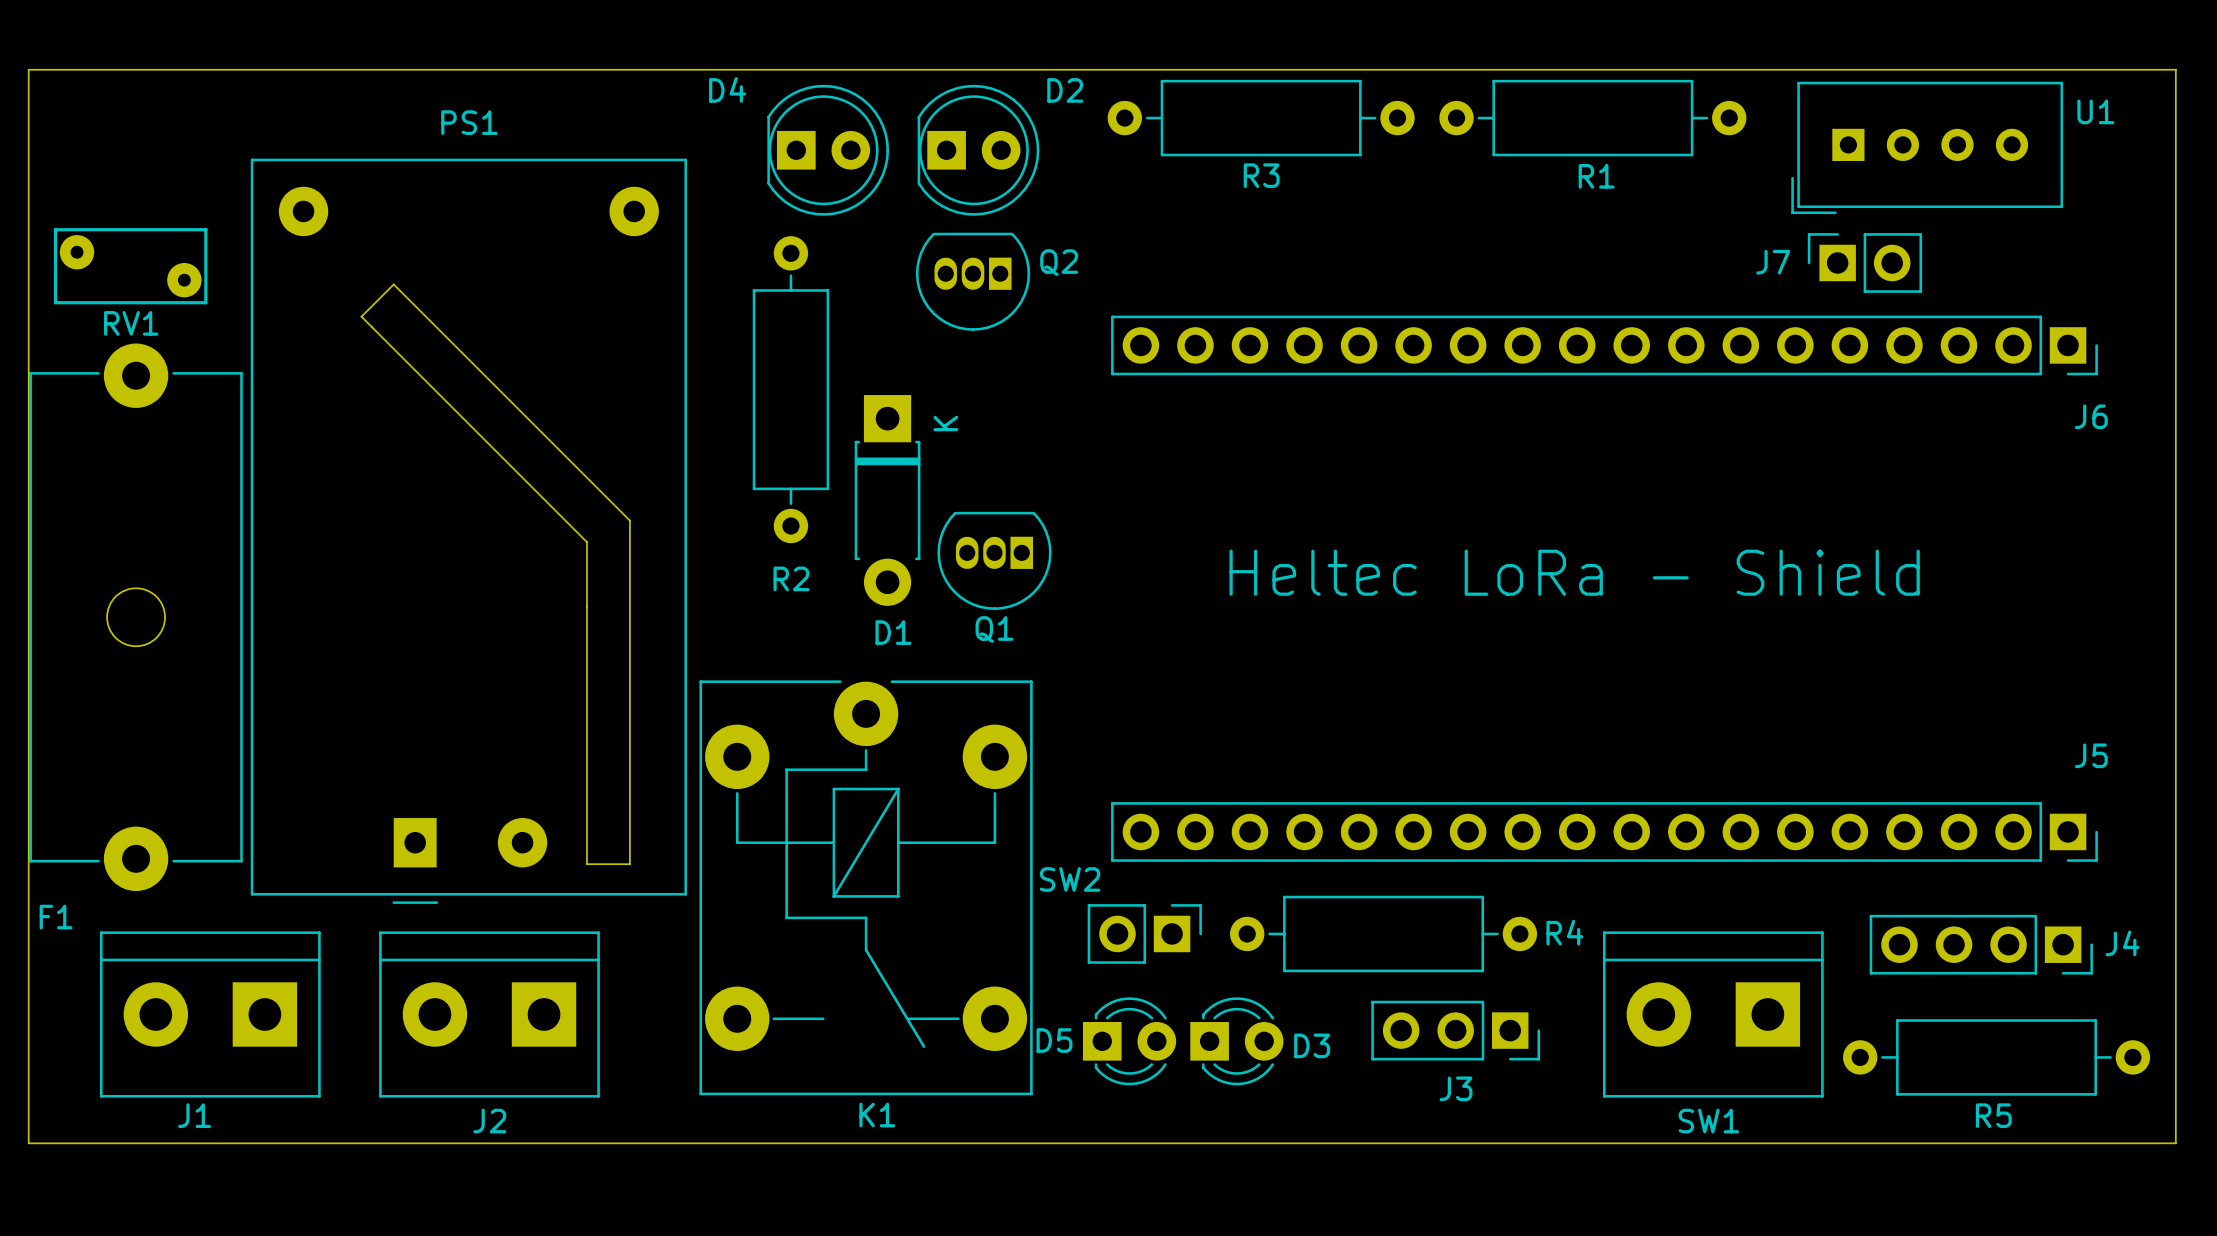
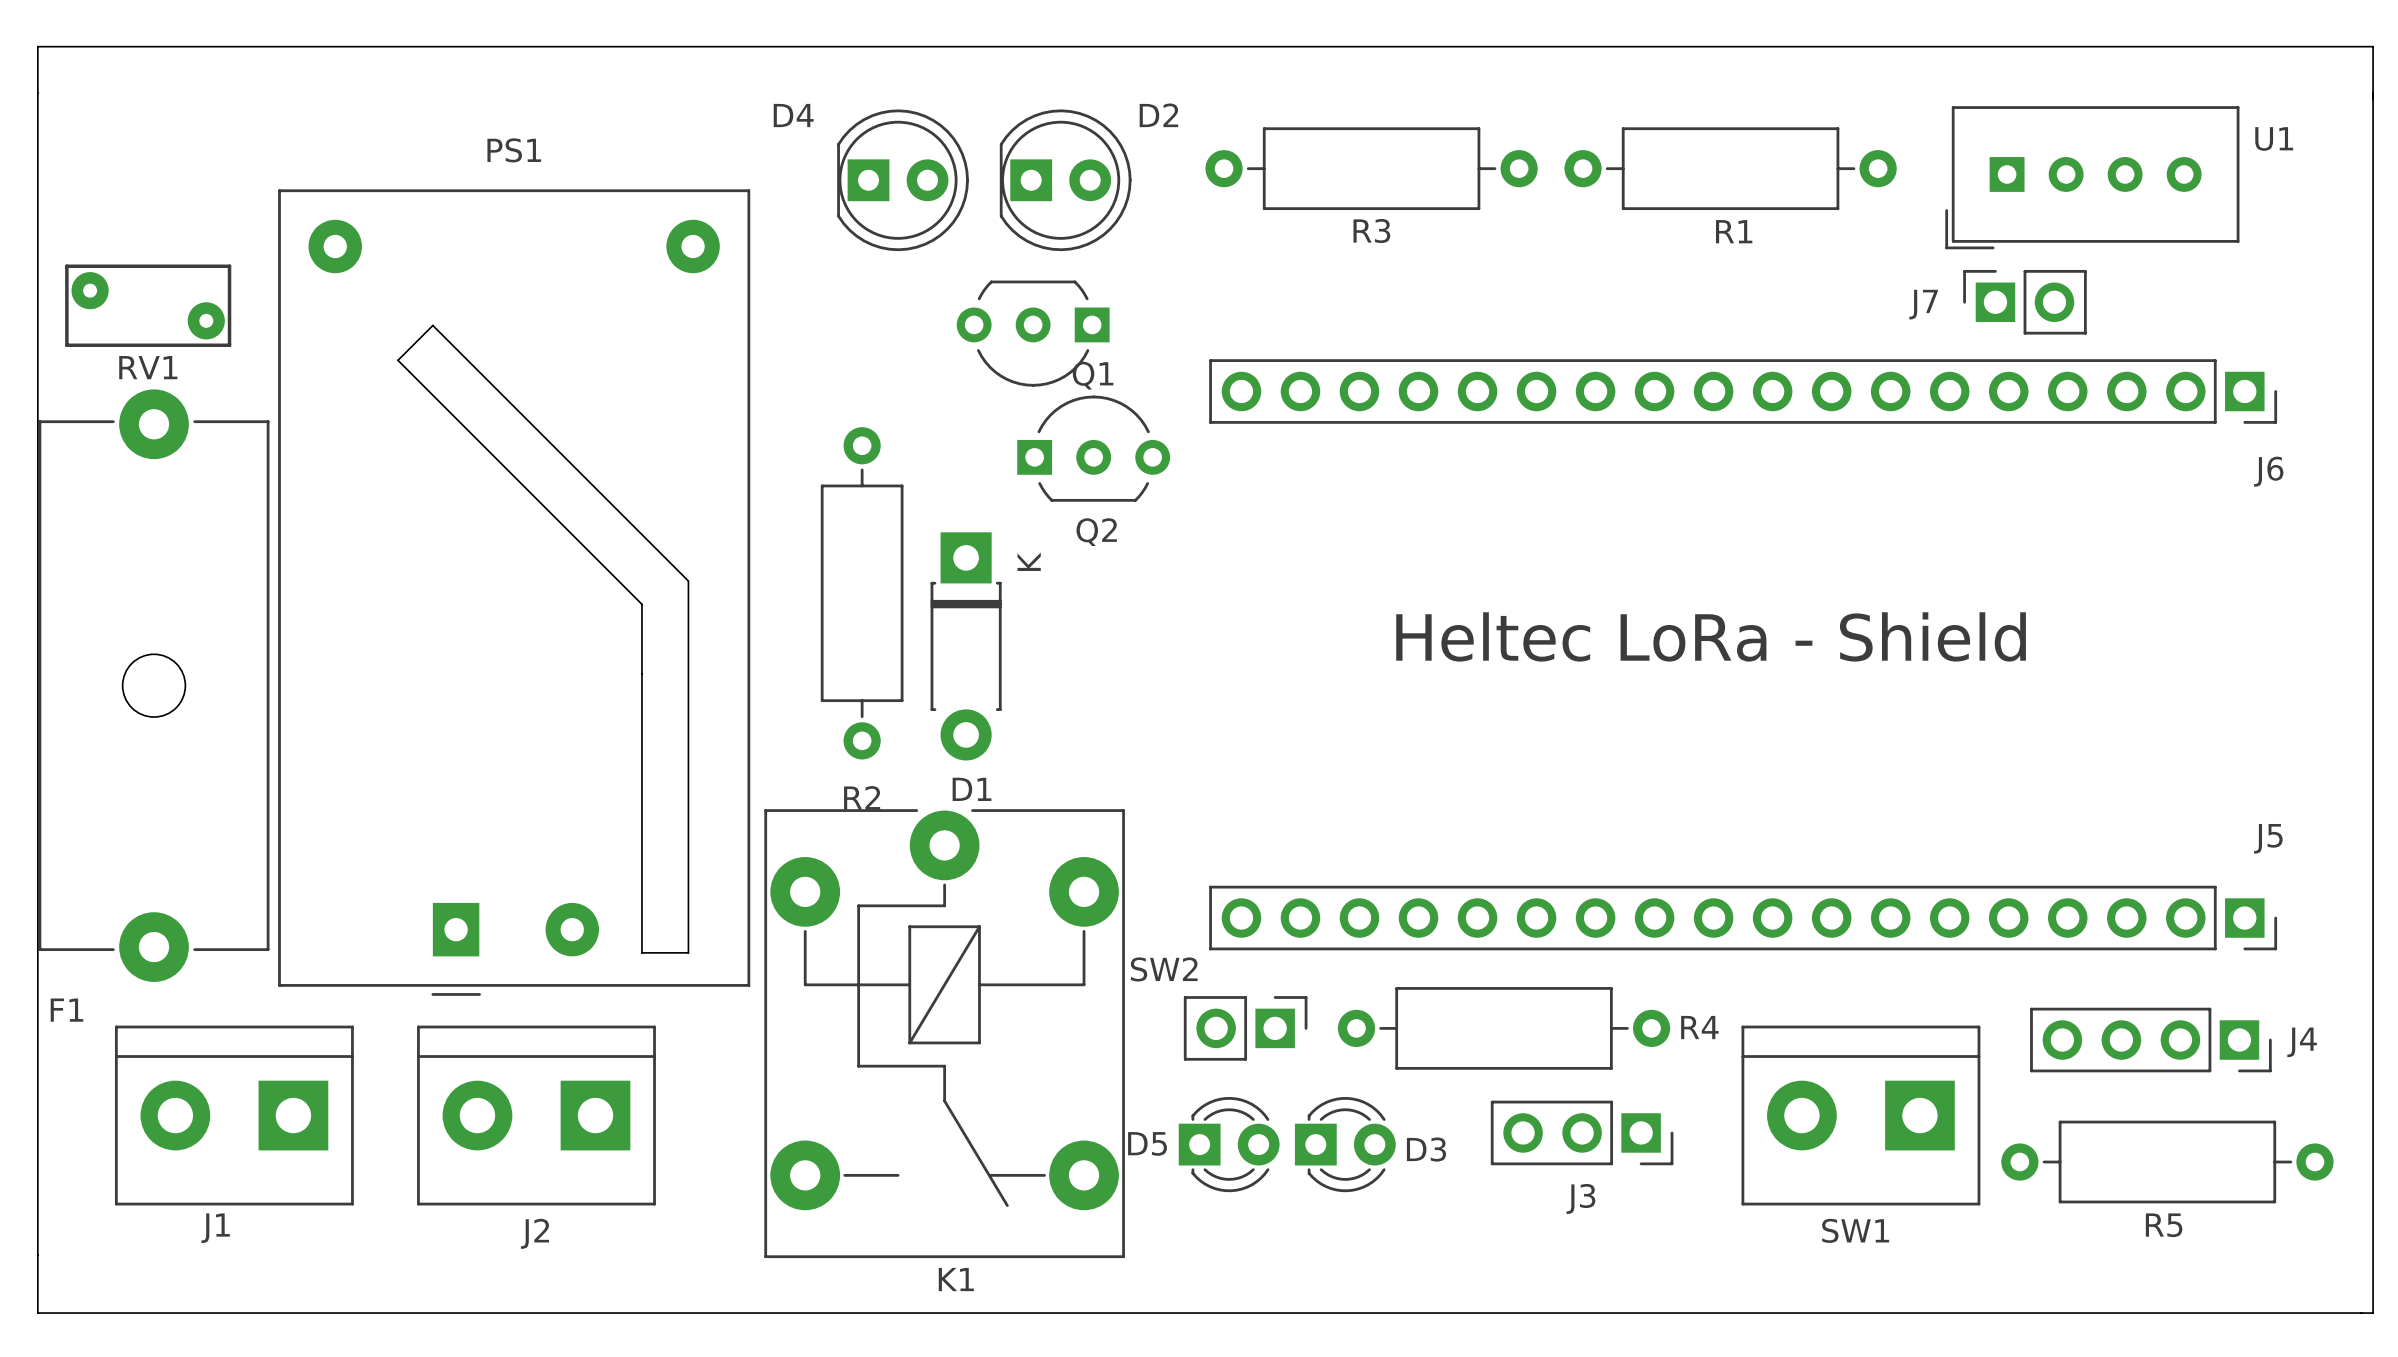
board edge: (28, 69) (2175, 69) (2175, 1143) (28, 1143) -> (37, 93) (37, 46) (2373, 46) (2373, 1313) (37, 1313) (37, 1254)
R3 position: (1261, 118) -> (1371, 168)
R1 position: (1592, 118) -> (1730, 168)
Q2 footprint: [915, 232, 1031, 331] -> [956, 280, 1110, 387]
Q2 name position: Q2 (1059, 262) -> Q2 (1096, 532)
R2 position: (790, 389) -> (862, 593)
D1 position: (887, 500) -> (966, 646)
Q1 footprint: [937, 511, 1052, 610] -> [1017, 395, 1171, 502]
Q1 name position: Q1 (994, 629) -> Q1 (1093, 375)
K1 position: (866, 887) -> (944, 1033)

